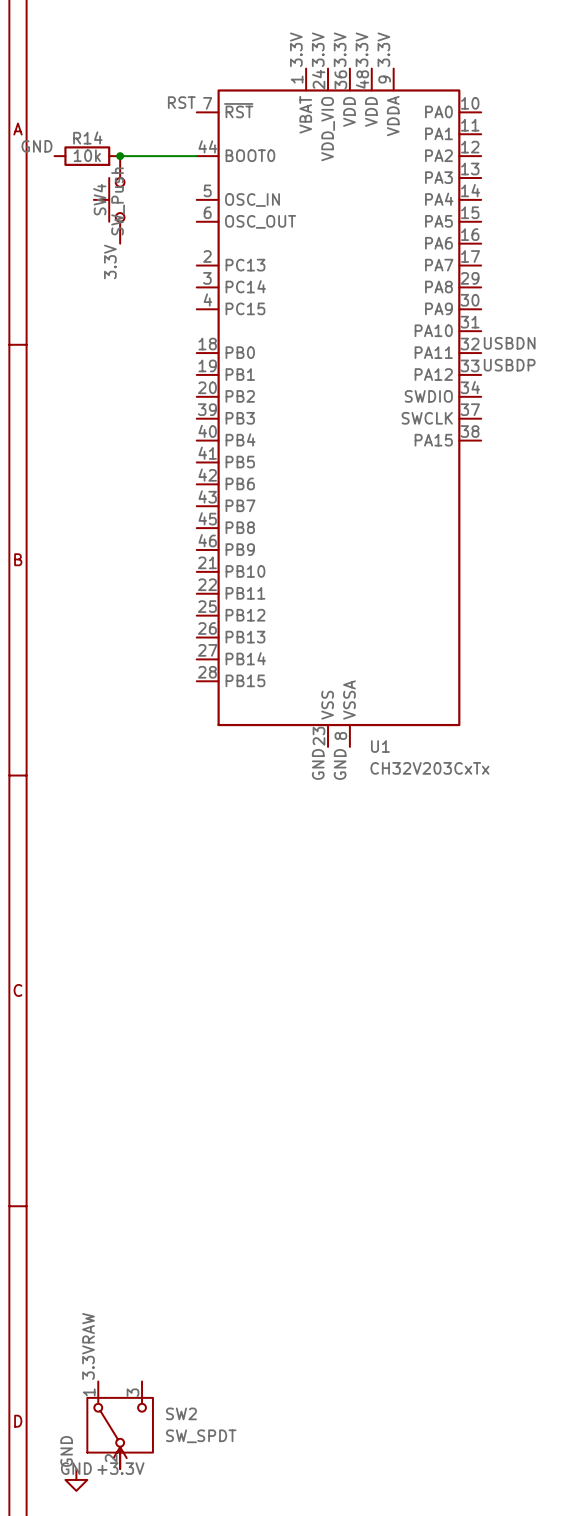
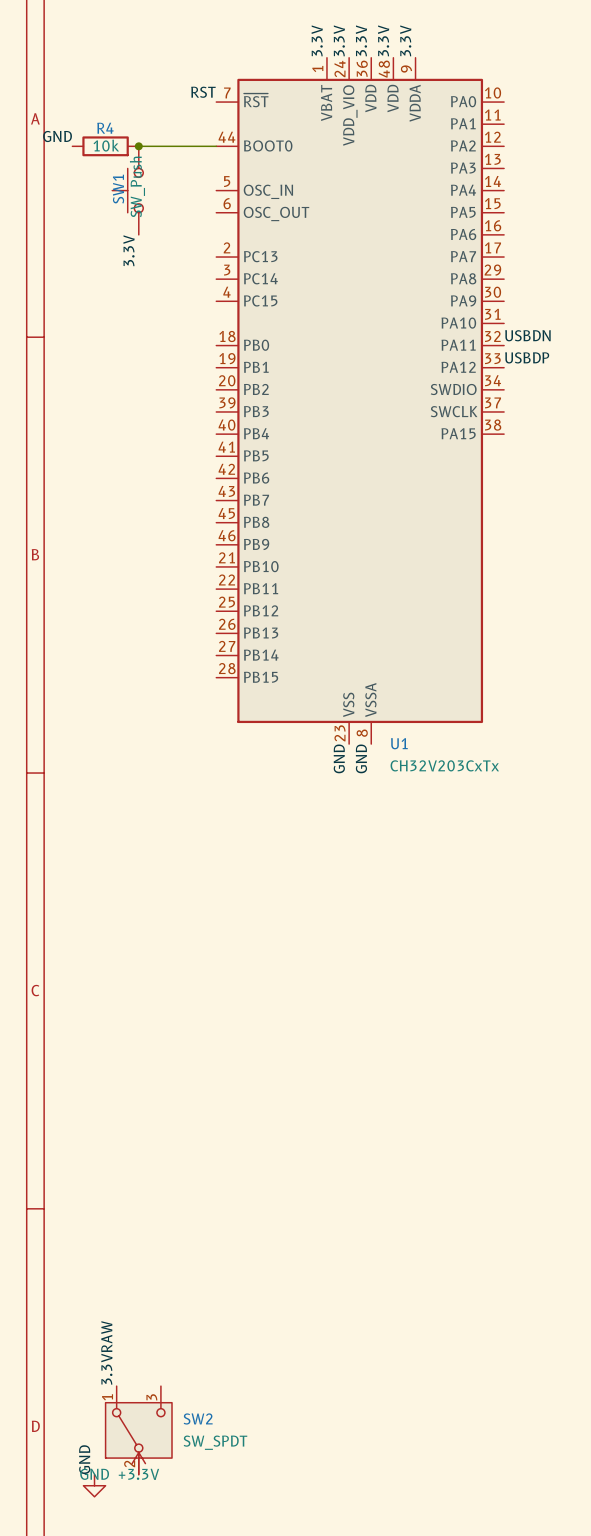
R14 name: R14 (87, 137) -> R4 (105, 128)
SW4 name: SW4 (99, 199) -> SW1 (118, 189)

